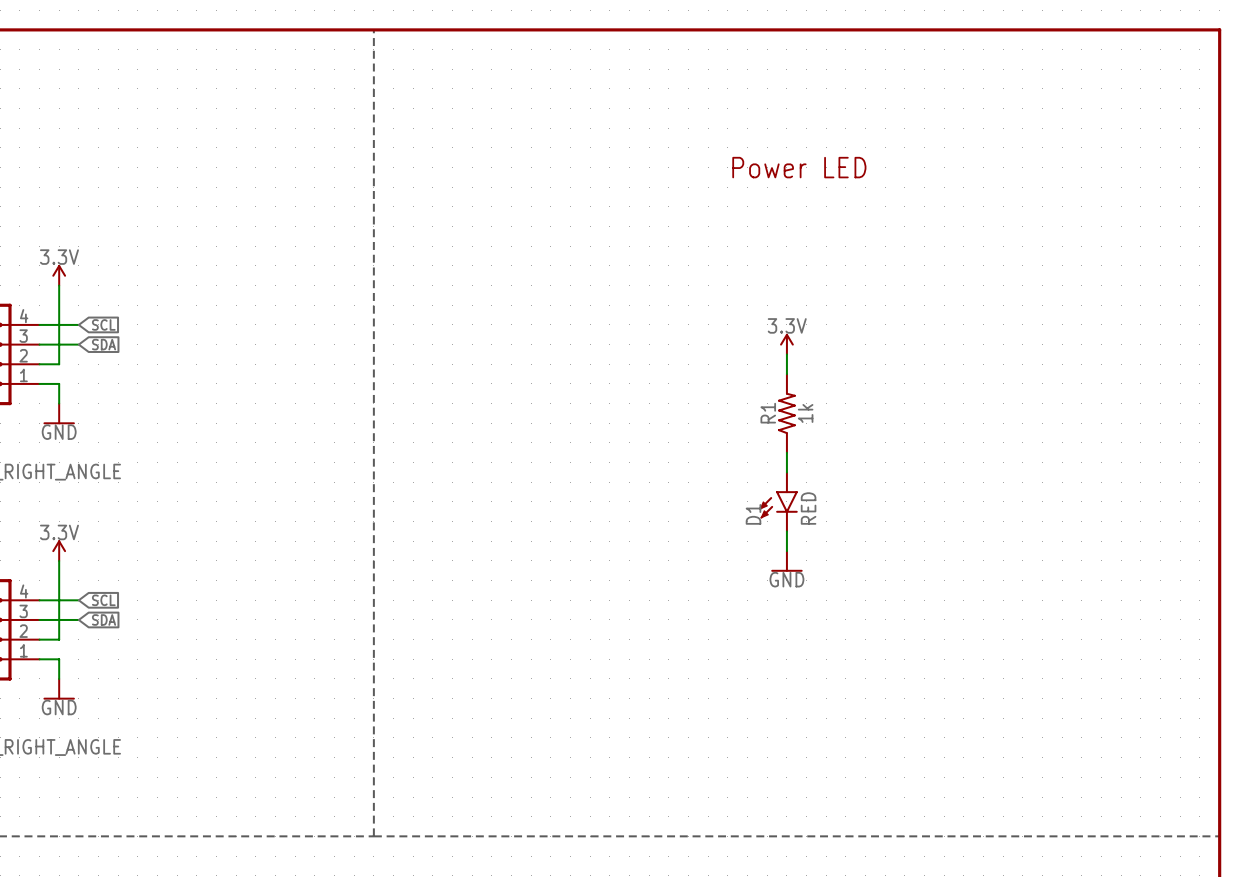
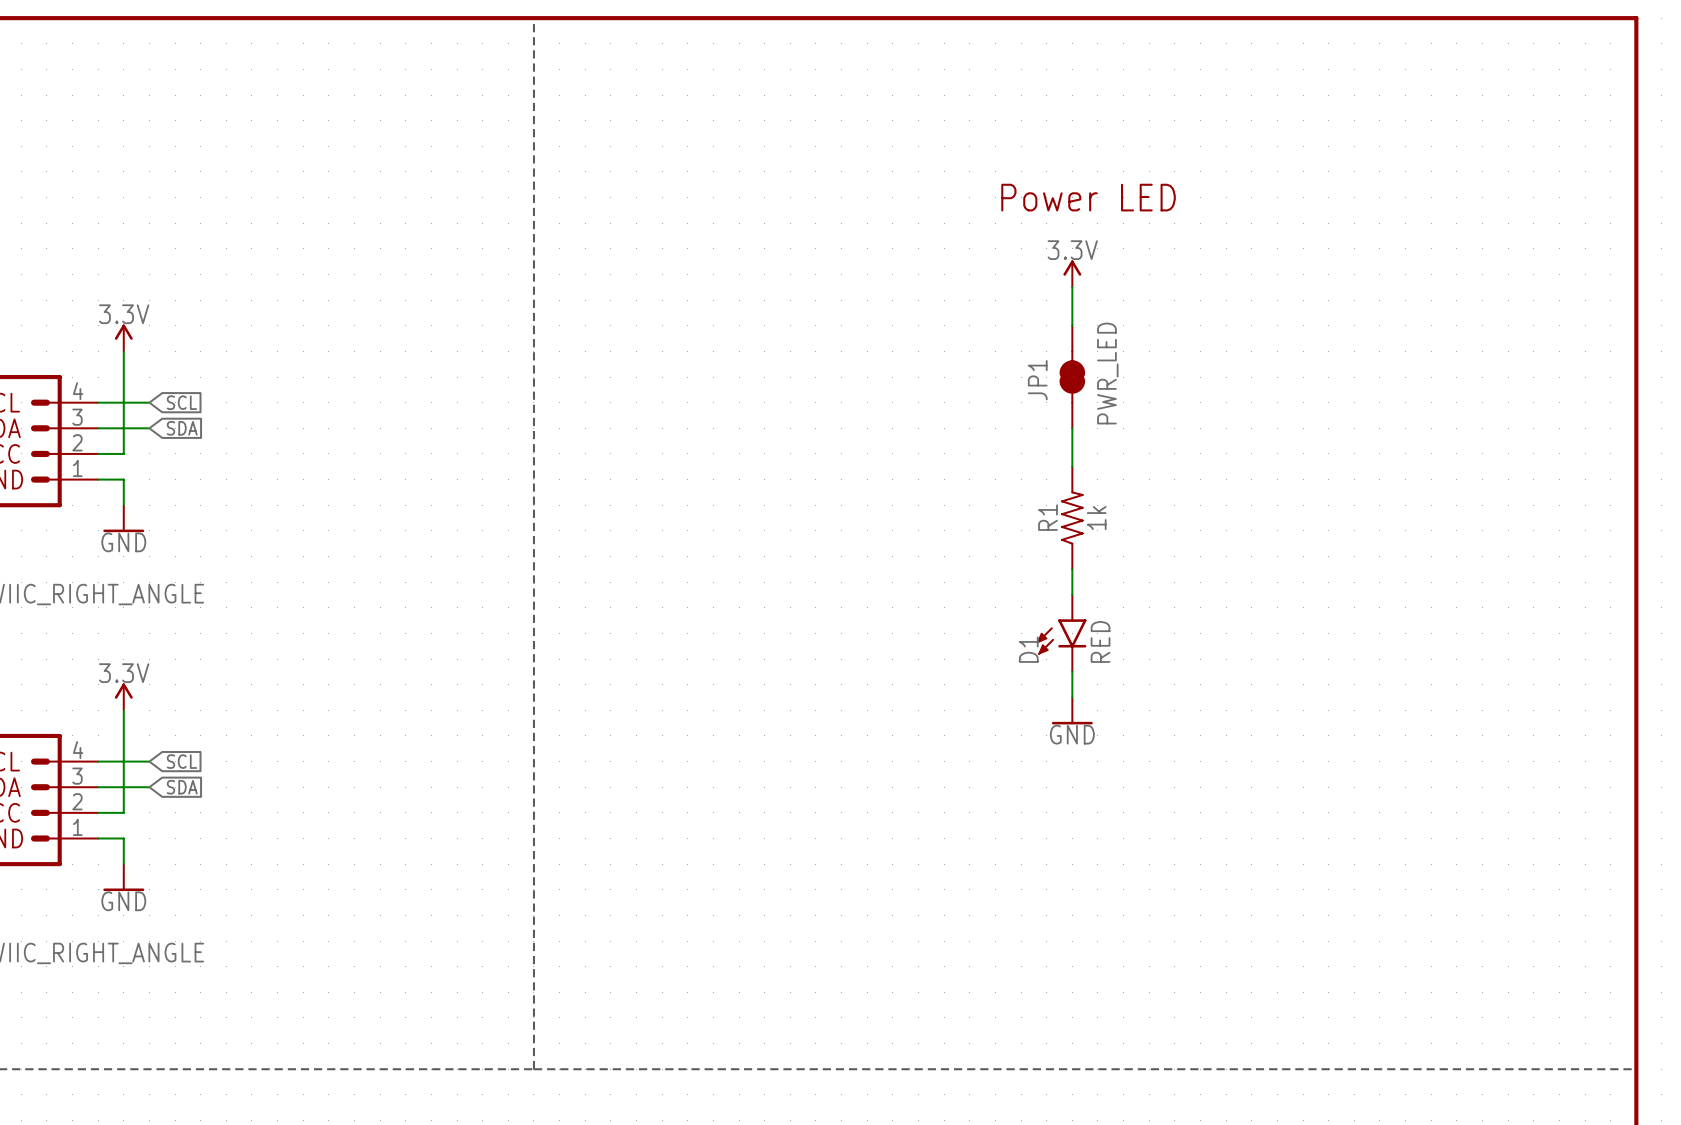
wire: none -> (1072, 287) (1072, 325)
JP1: none -> PWR_LED (1072, 377)
power symbol position: 3.3V (786, 344) -> 3.3V (1072, 273)

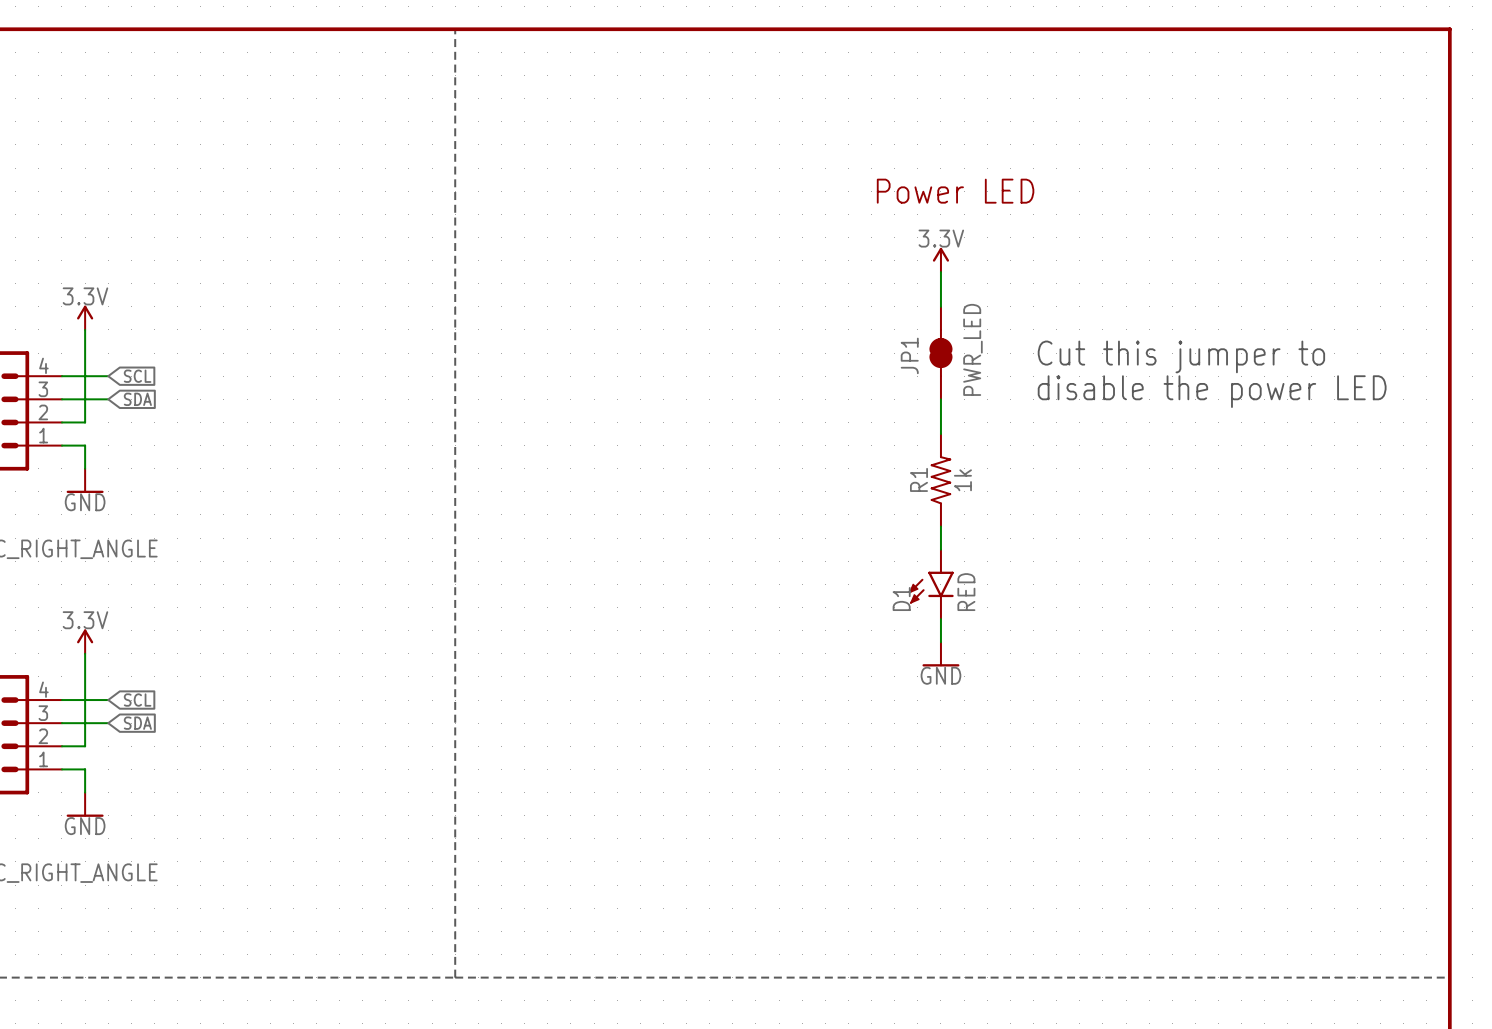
text: none -> Cut this jumper to (1181, 356)
text: none -> disable the power LED (1212, 391)

